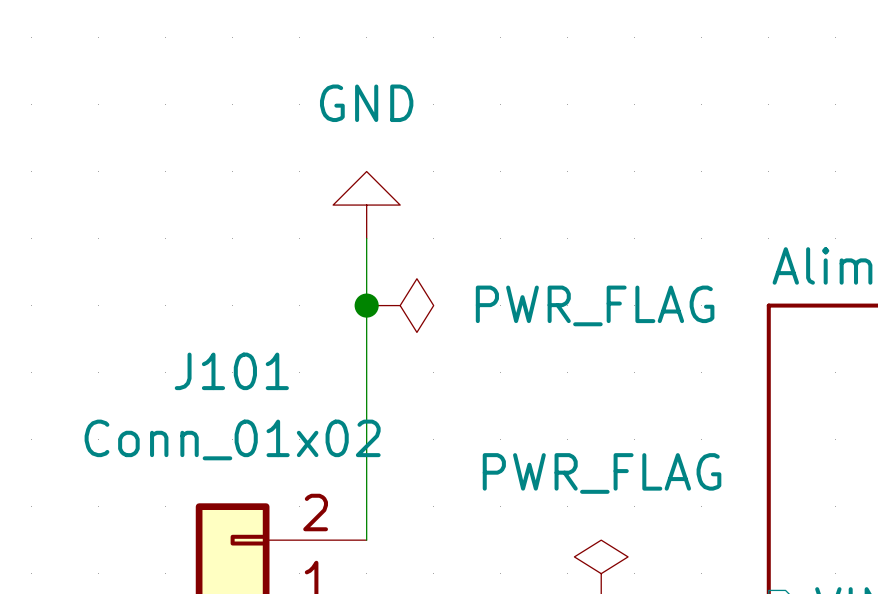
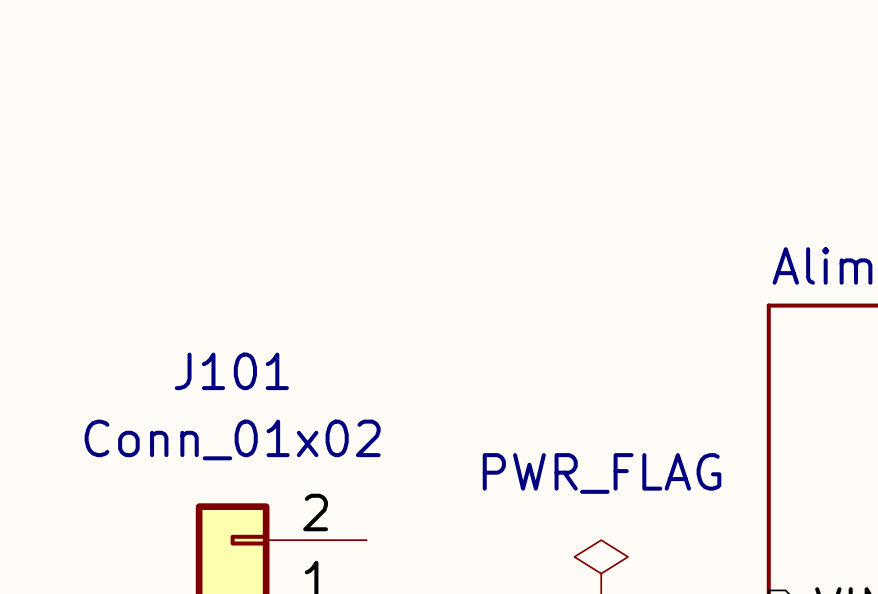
power symbol: GND (366, 205) -> none
wire: (366, 238) (366, 540) -> none
junction: (366, 305) -> none
power symbol: PWR_FLAG (400, 305) -> none

